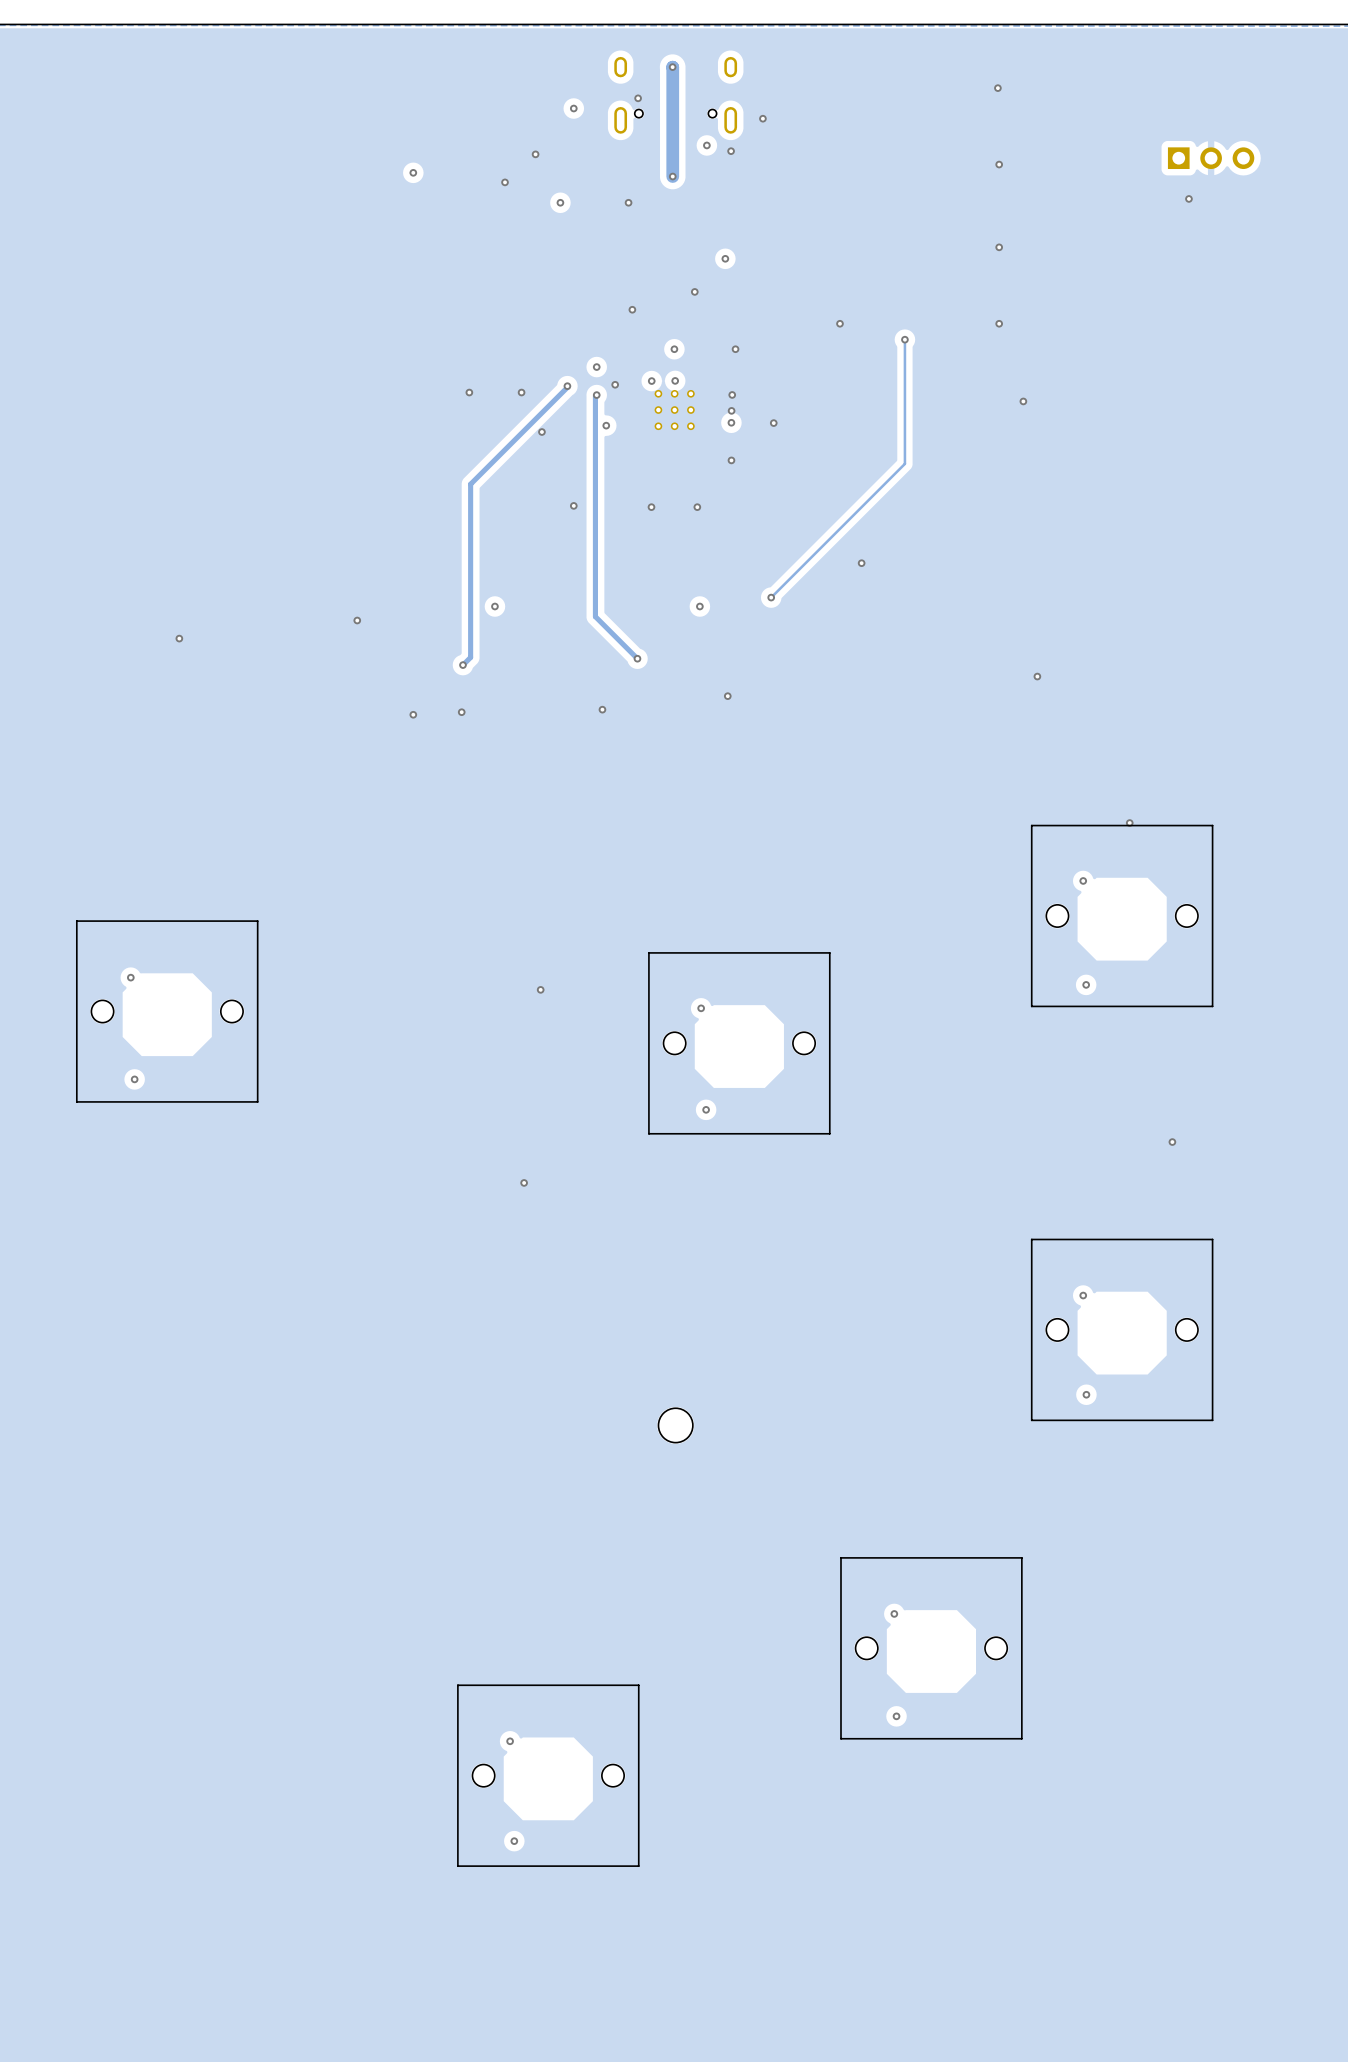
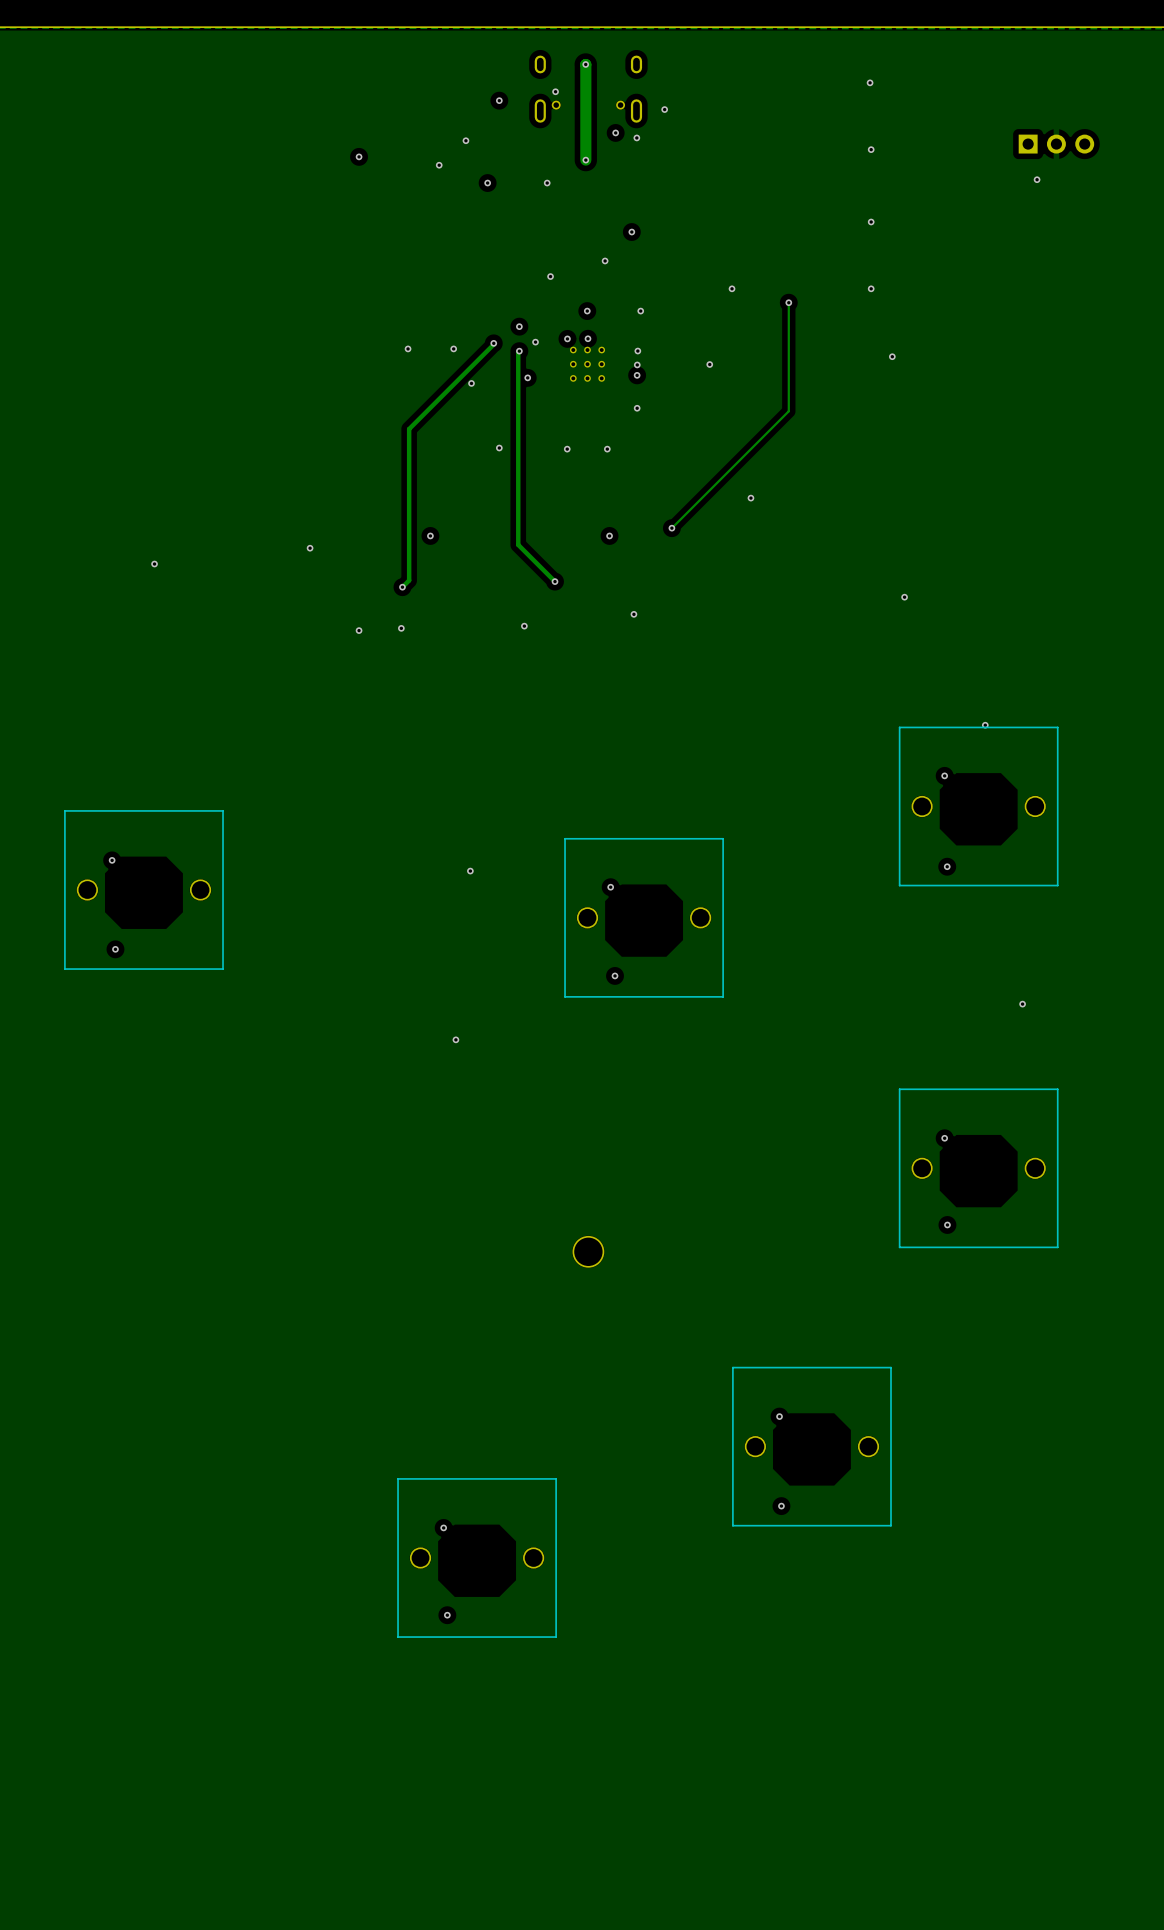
via position: (773, 423) -> (709, 364)

